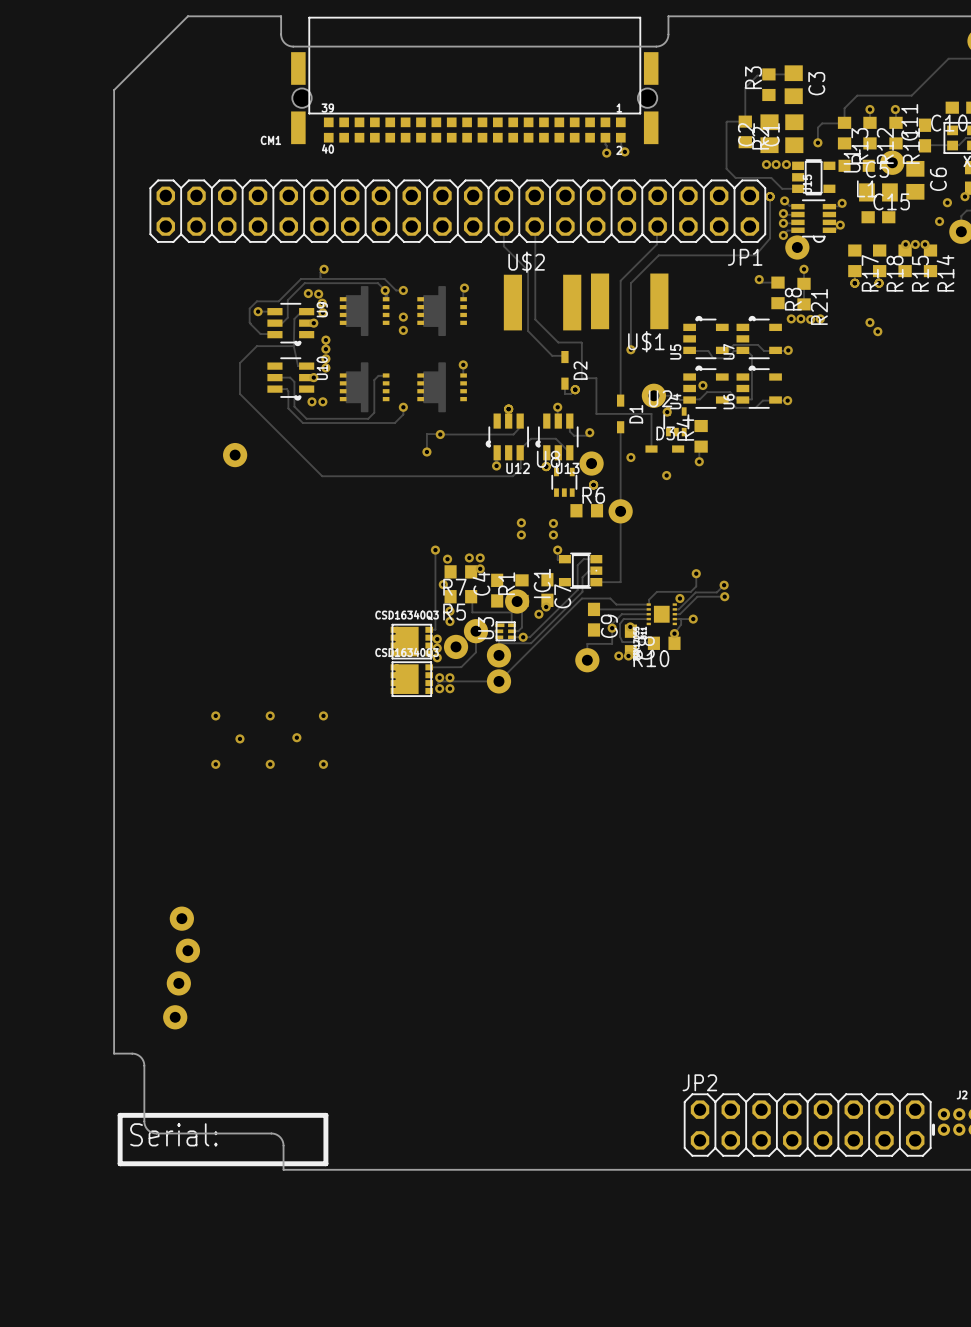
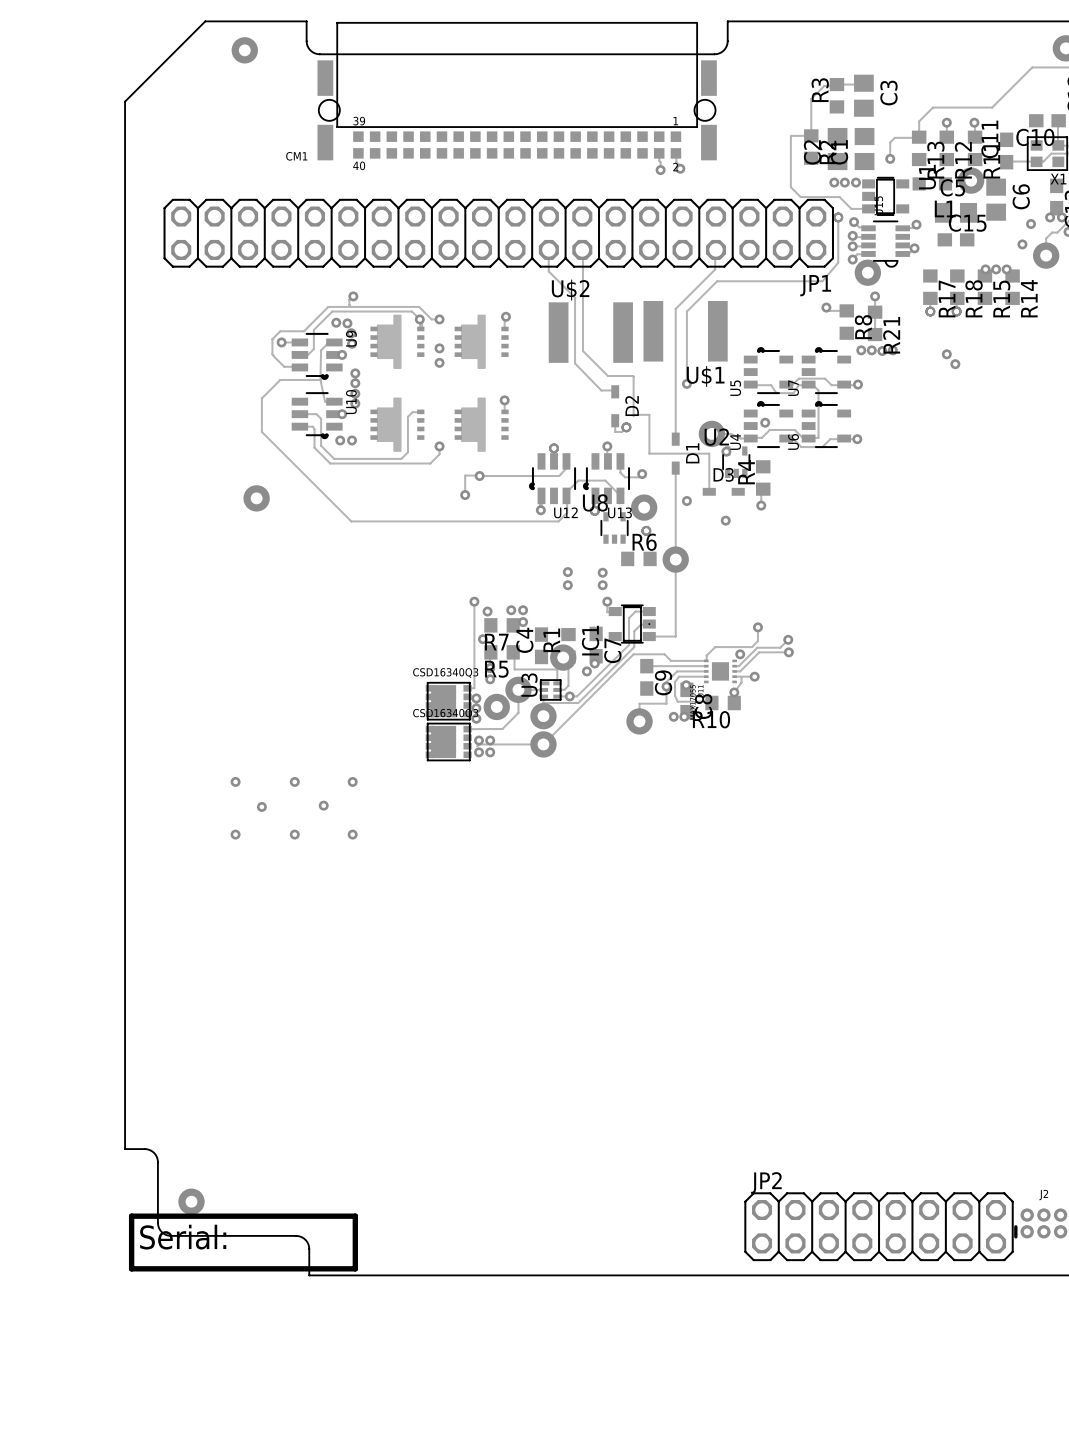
part: none -> (244, 50)
part: (181, 918) -> none
part: (187, 950) -> none
part: (178, 983) -> none
part: (175, 1017) -> none
part: none -> (191, 1201)

